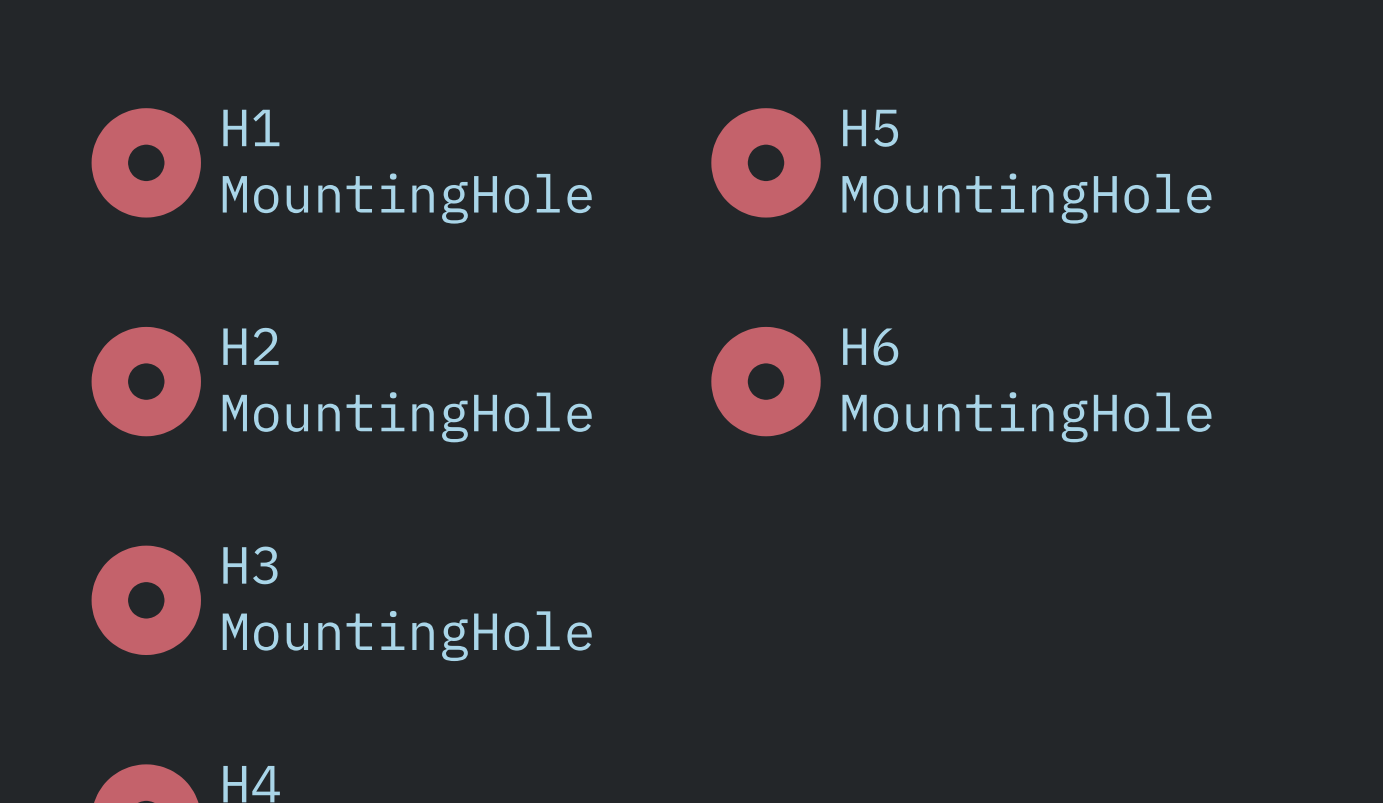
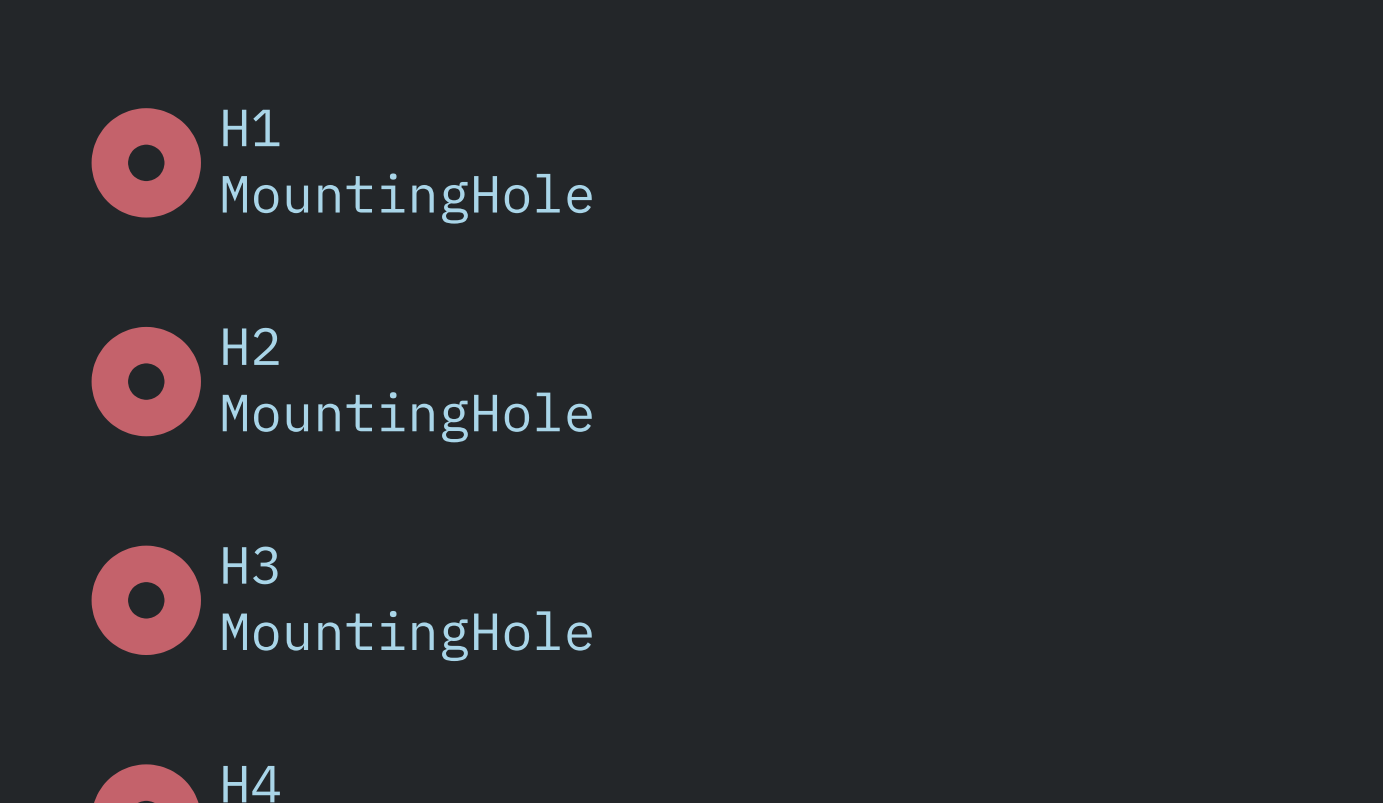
H5: MountingHole (766, 162) -> none
H6: MountingHole (766, 381) -> none

